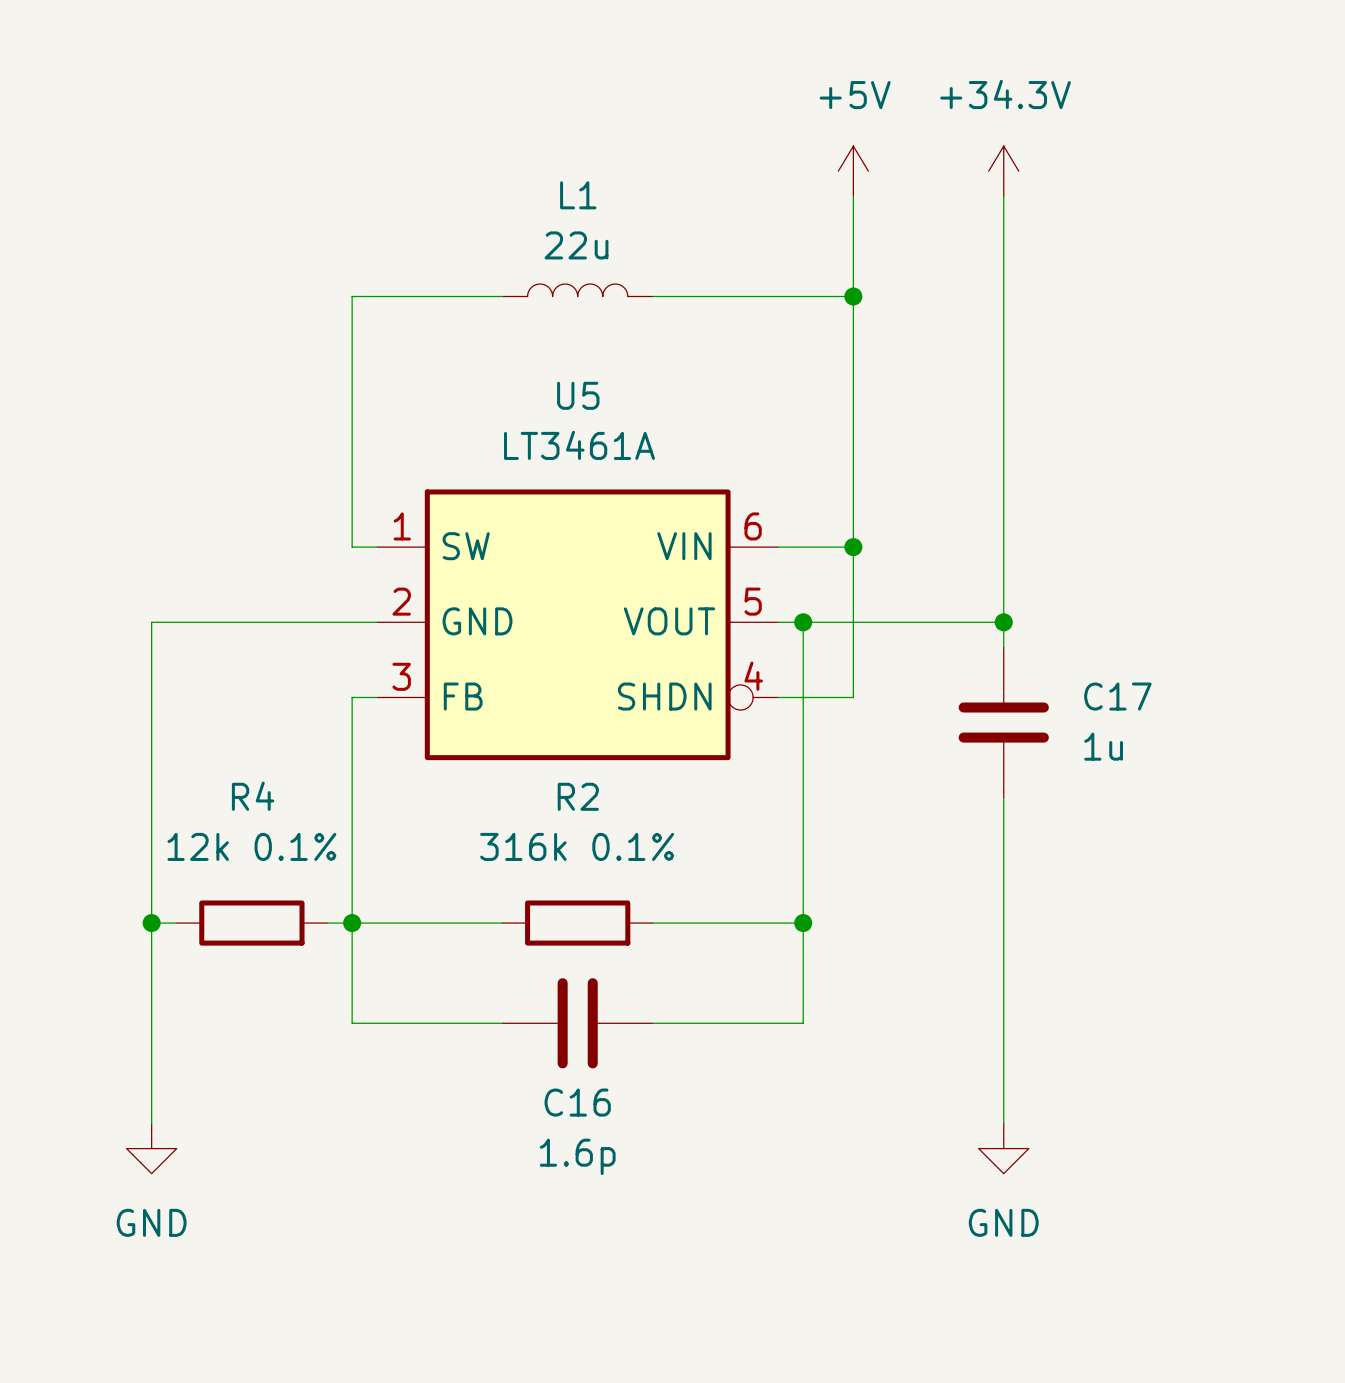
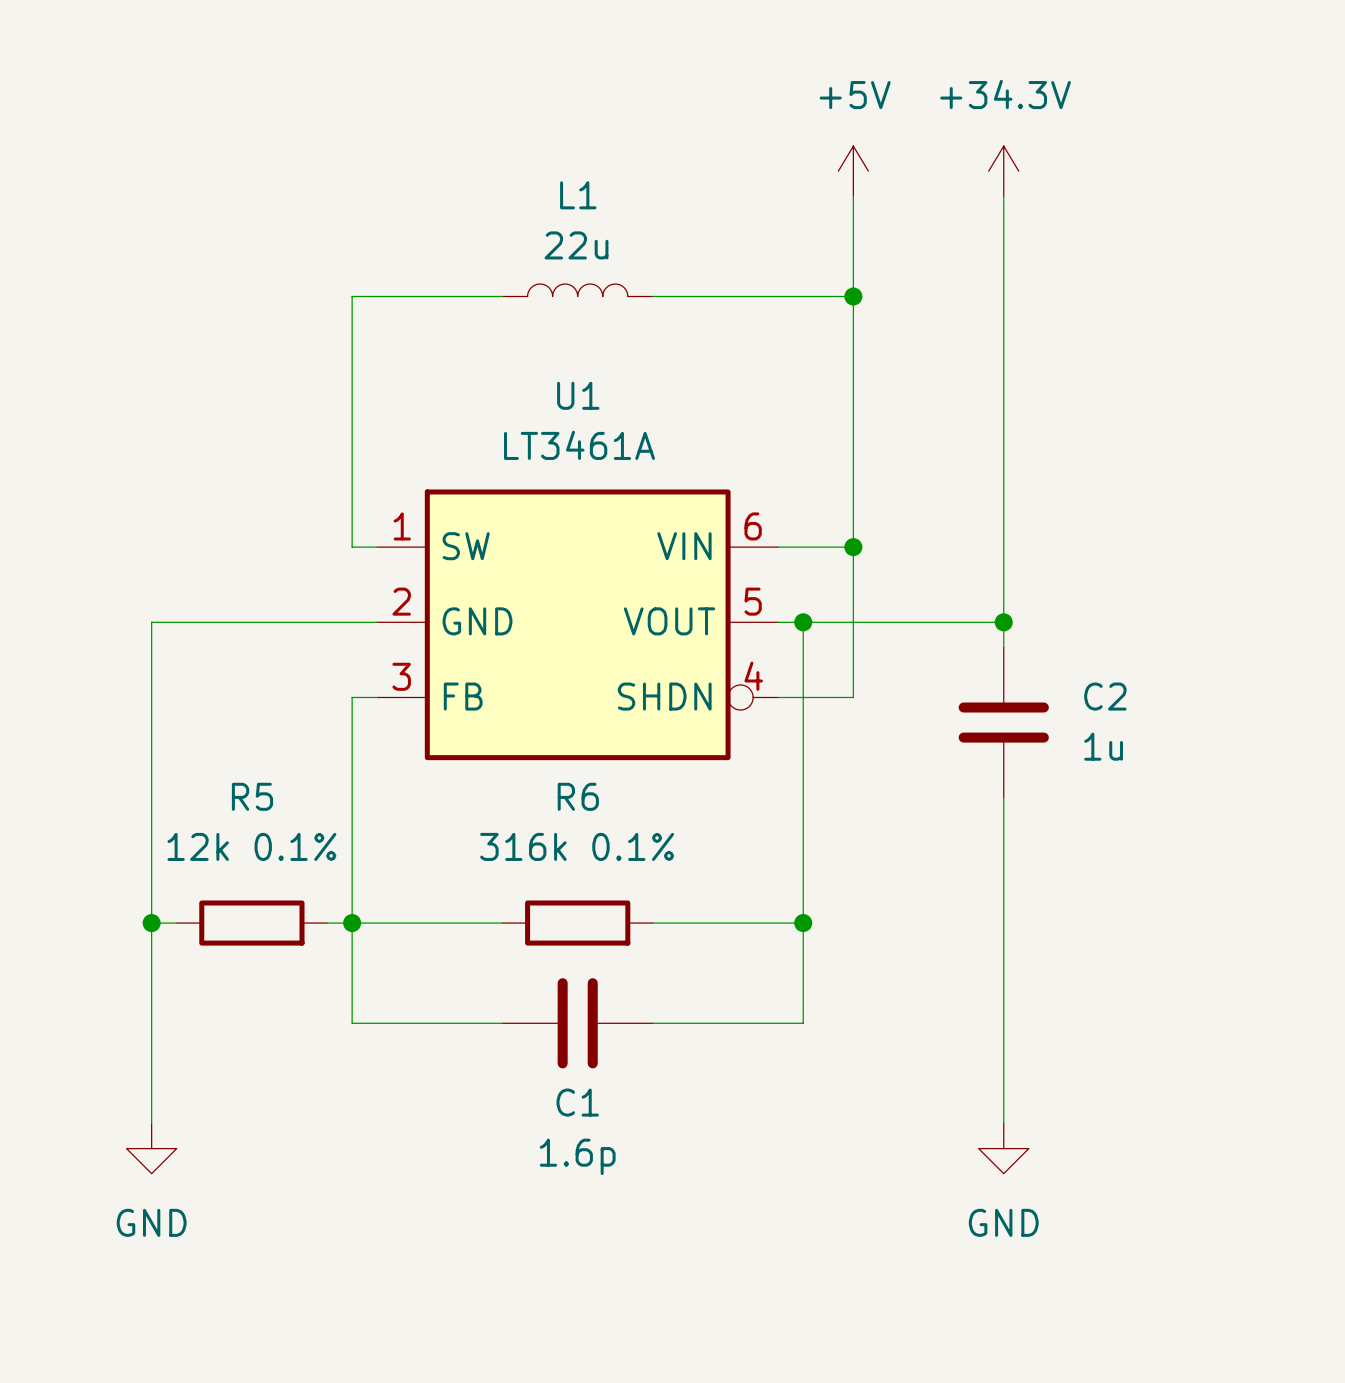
U5 name: U5 (578, 395) -> U1 (578, 395)
C17 name: C17 (1117, 696) -> C2 (1105, 696)
R4 name: R4 (253, 796) -> R5 (252, 796)
R2 name: R2 (578, 796) -> R6 (578, 796)
C16 name: C16 (577, 1102) -> C1 (577, 1102)

